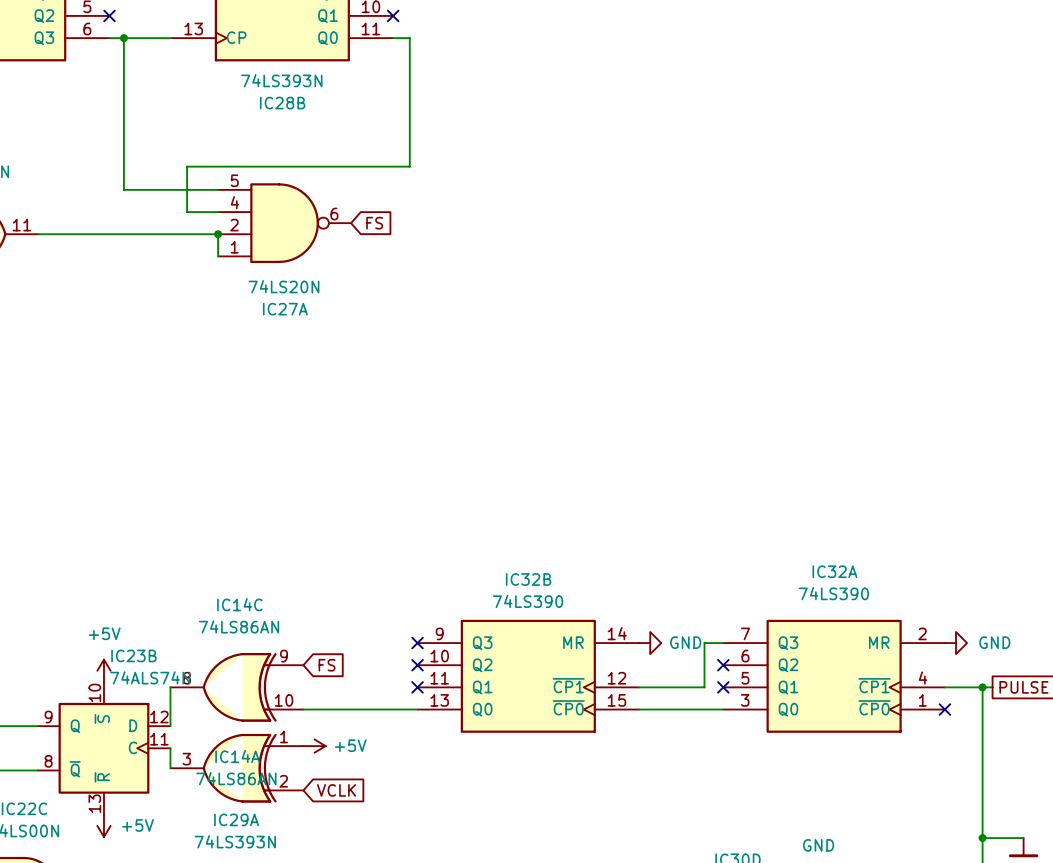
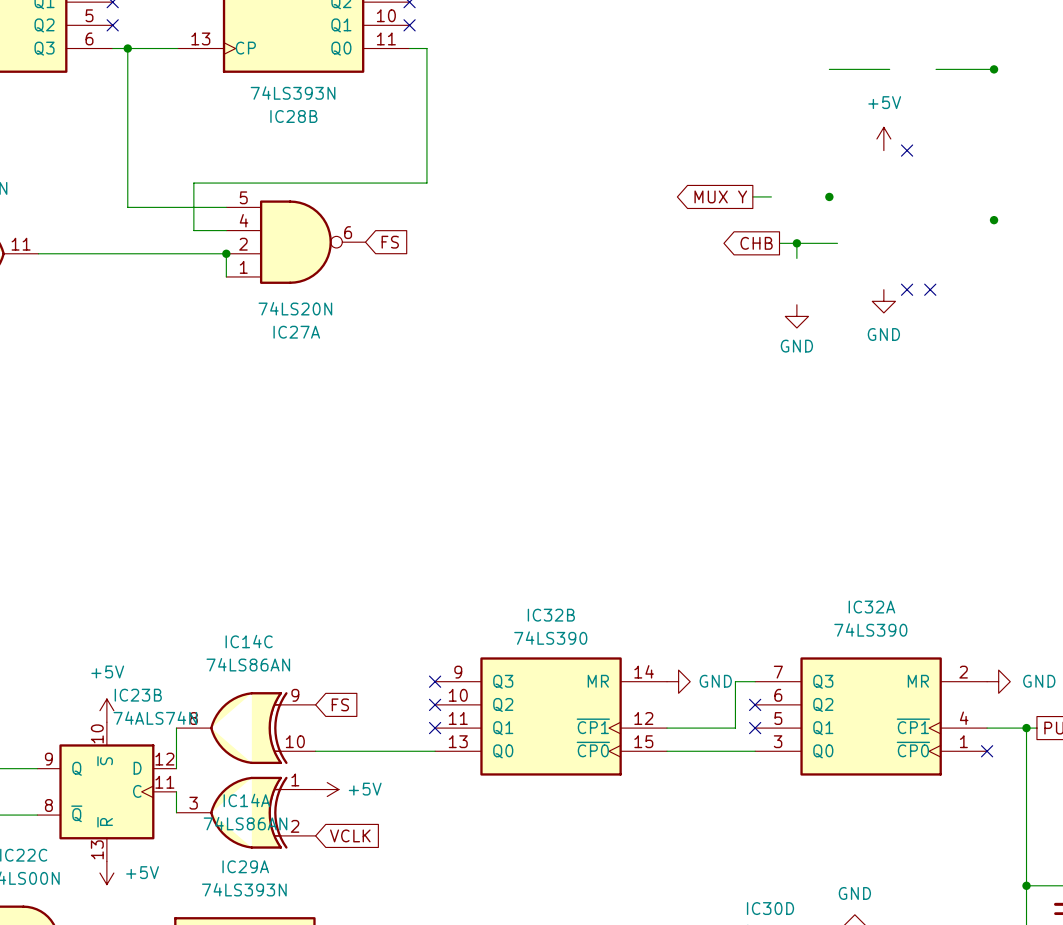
wire: none -> (829, 69) (889, 69)
wire: none -> (936, 69) (994, 69)
junction: none -> (994, 69)
power symbol: none -> +5V (883, 138)
no-connect mark: none -> (907, 150)
global label: none -> MUX Y (720, 196)
wire: none -> (752, 196) (771, 196)
junction: none -> (829, 196)
junction: none -> (994, 220)
global label: none -> CHB (756, 243)
wire: none -> (779, 243) (837, 243)
wire: none -> (796, 243) (796, 258)
junction: none -> (796, 243)
no-connect mark: none -> (907, 289)
no-connect mark: none -> (930, 289)
power symbol: none -> GND (883, 301)
power symbol: none -> GND (796, 316)

